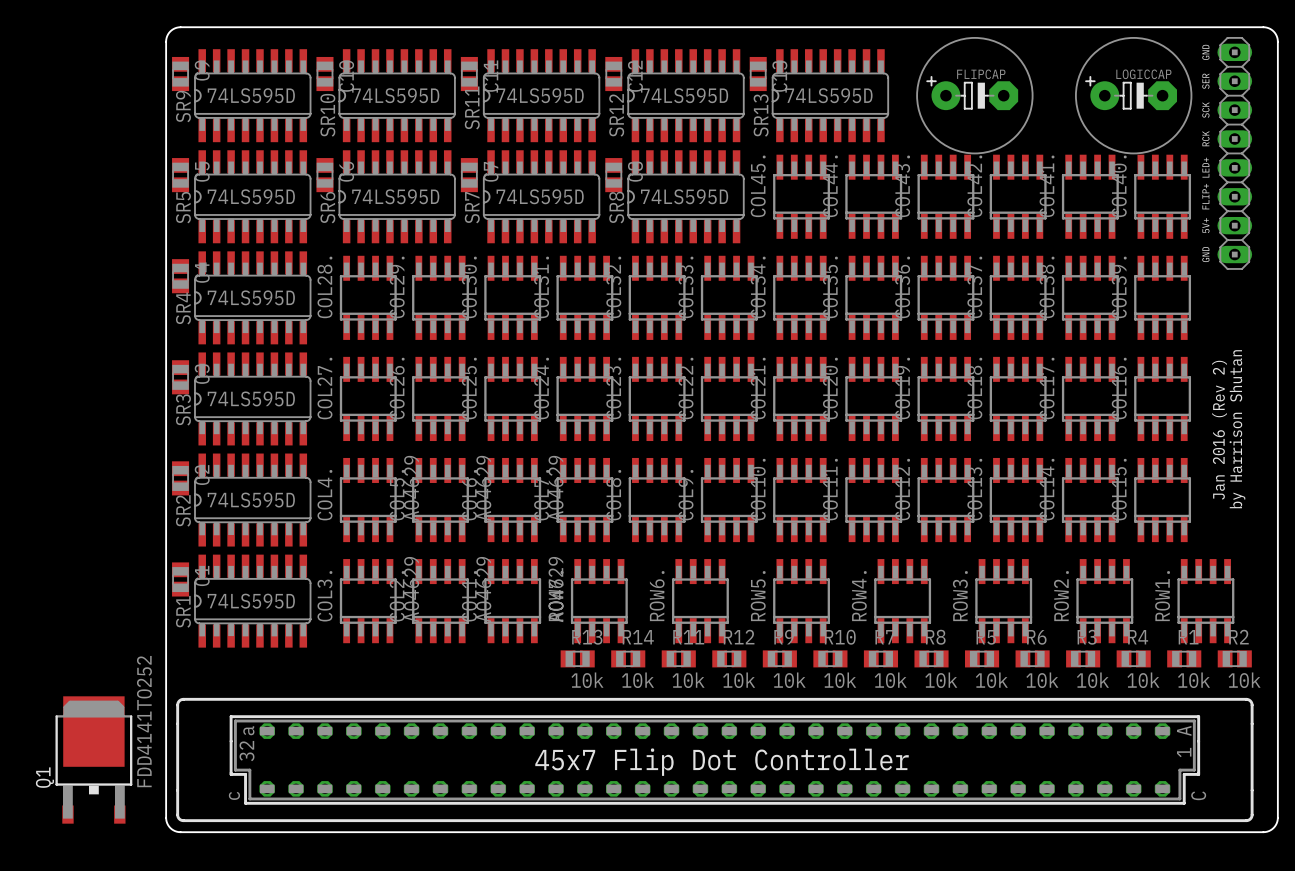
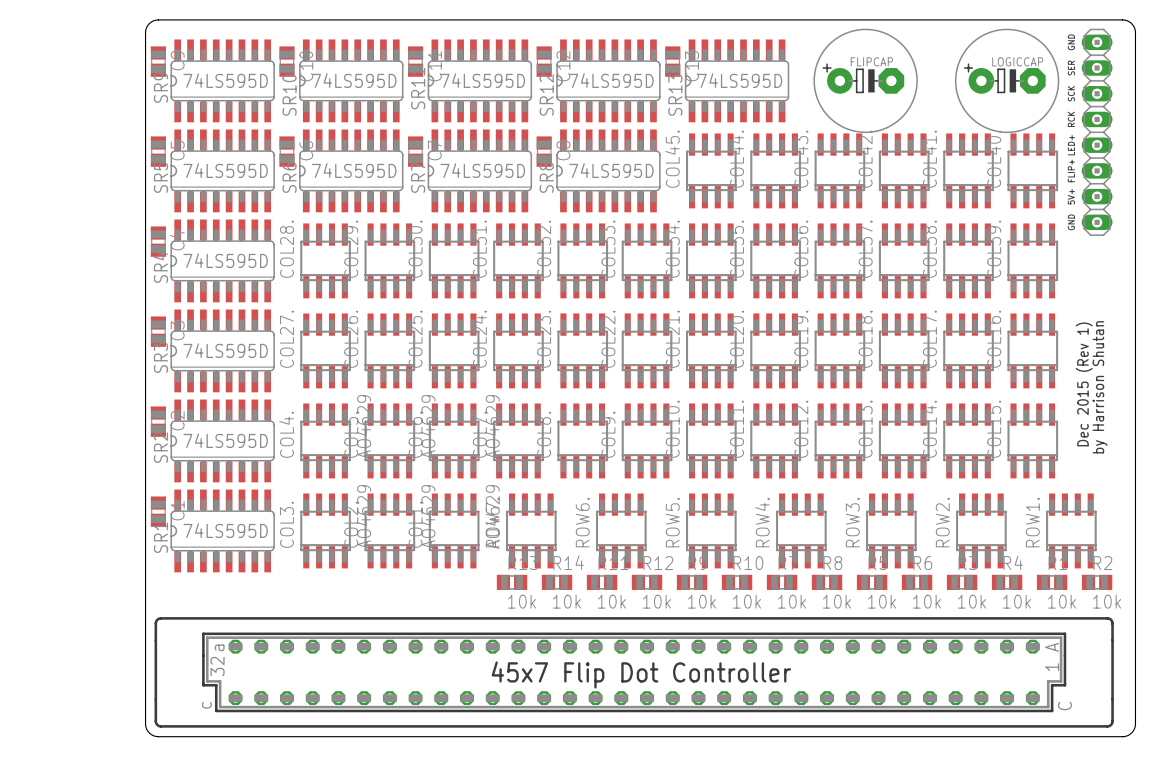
text: Jan 2016 (Rev 2) (1219, 430) -> Dec 2015 (Rev 1) (1084, 384)
Q1: FDD4141TO252 (93, 759) -> none

